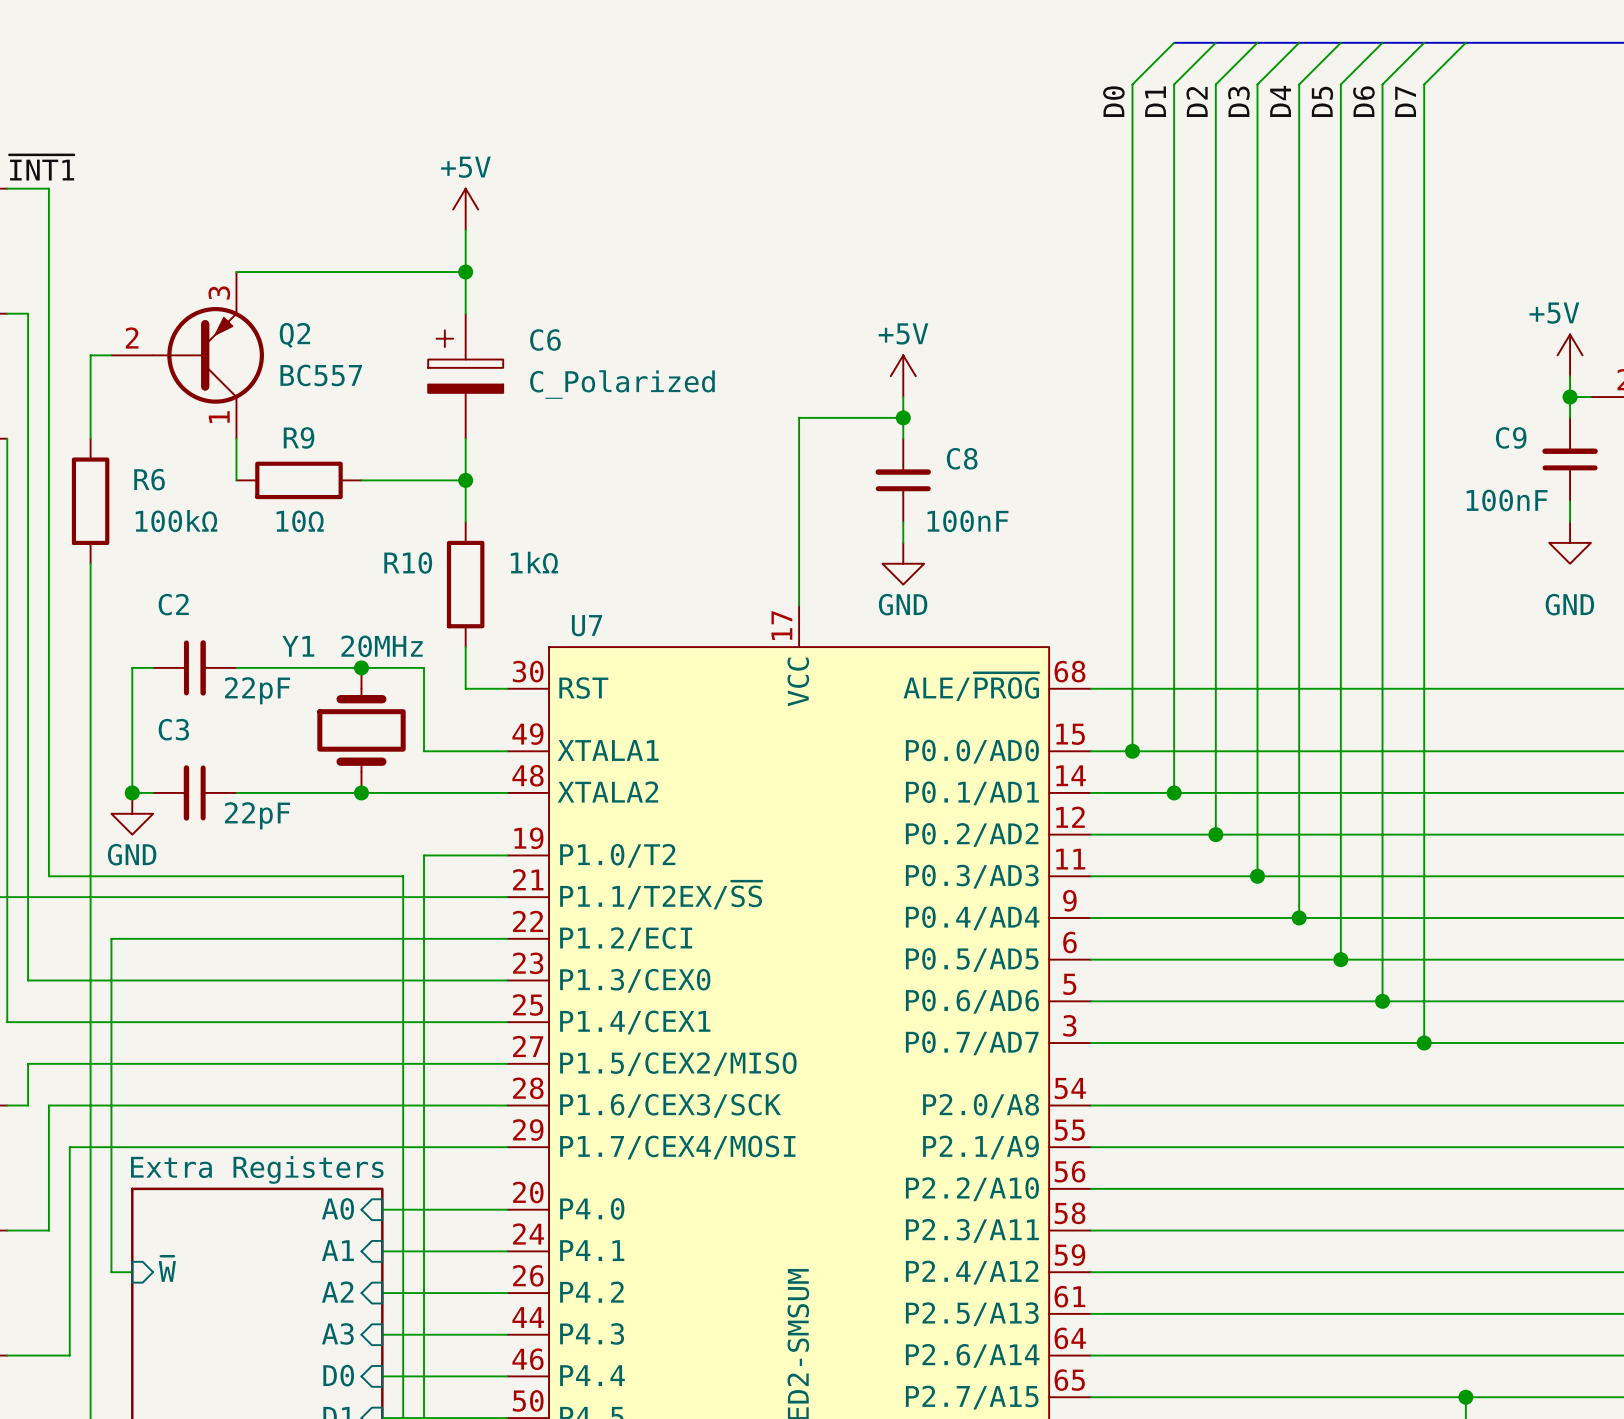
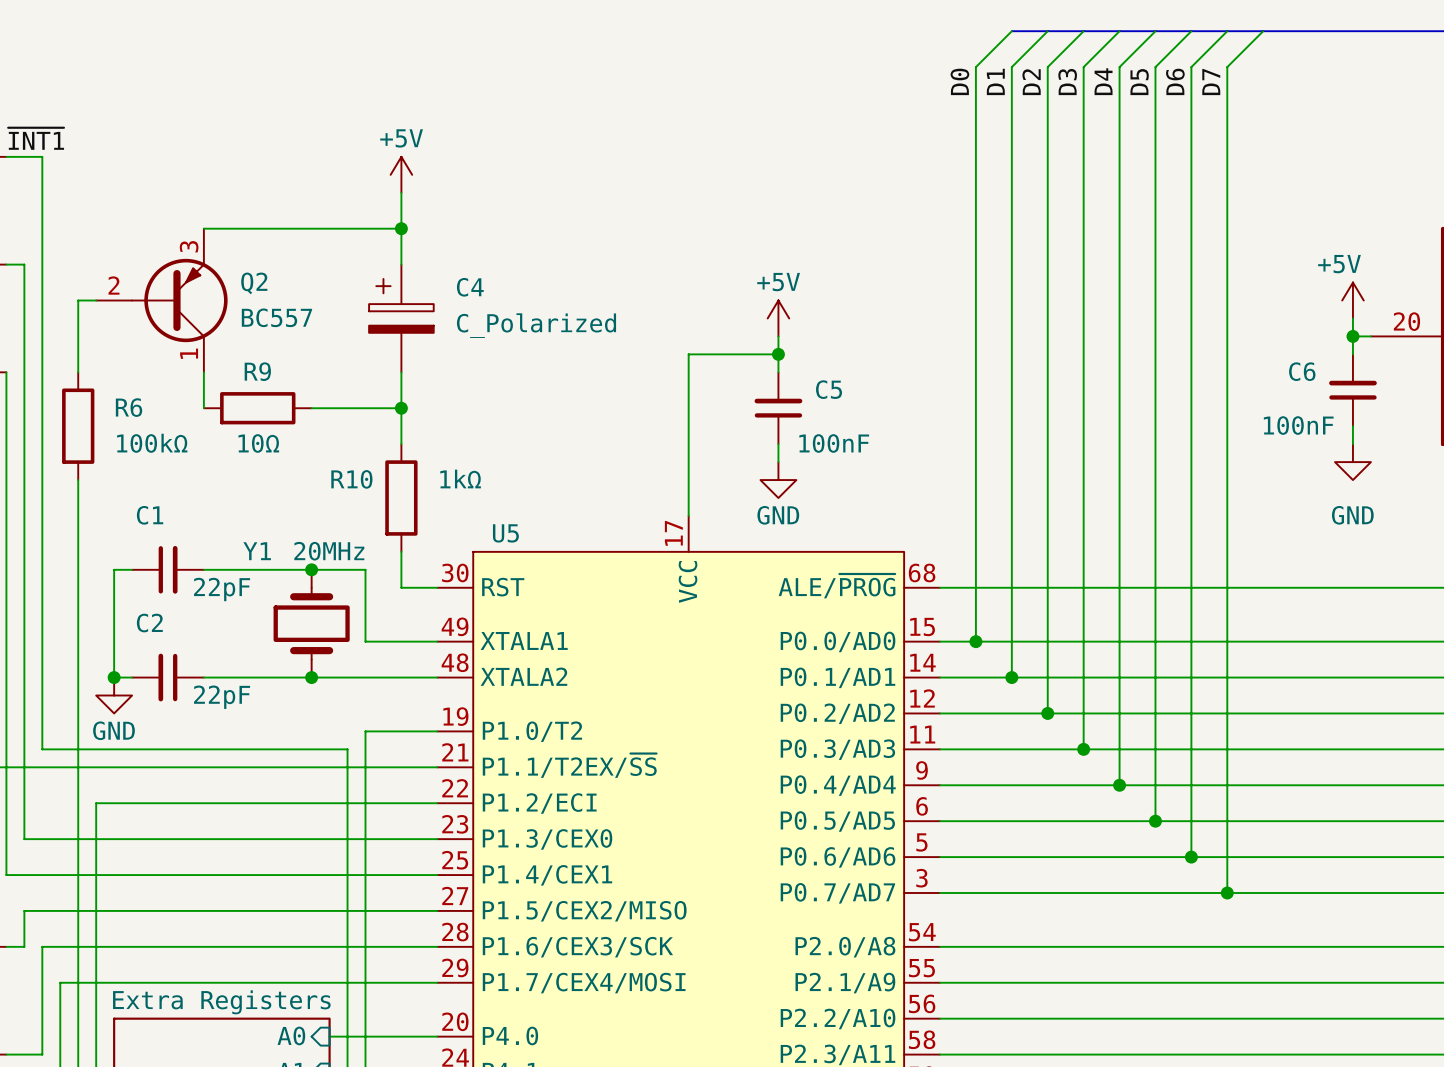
C6 name: C6 (545, 340) -> C4 (470, 287)
C9 name: C9 (1511, 437) -> C6 (1302, 371)
C8 name: C8 (962, 458) -> C5 (829, 389)
C2 name: C2 (173, 604) -> C1 (150, 515)
U7 name: U7 (587, 625) -> U5 (505, 533)
C3 name: C3 (173, 729) -> C2 (149, 623)

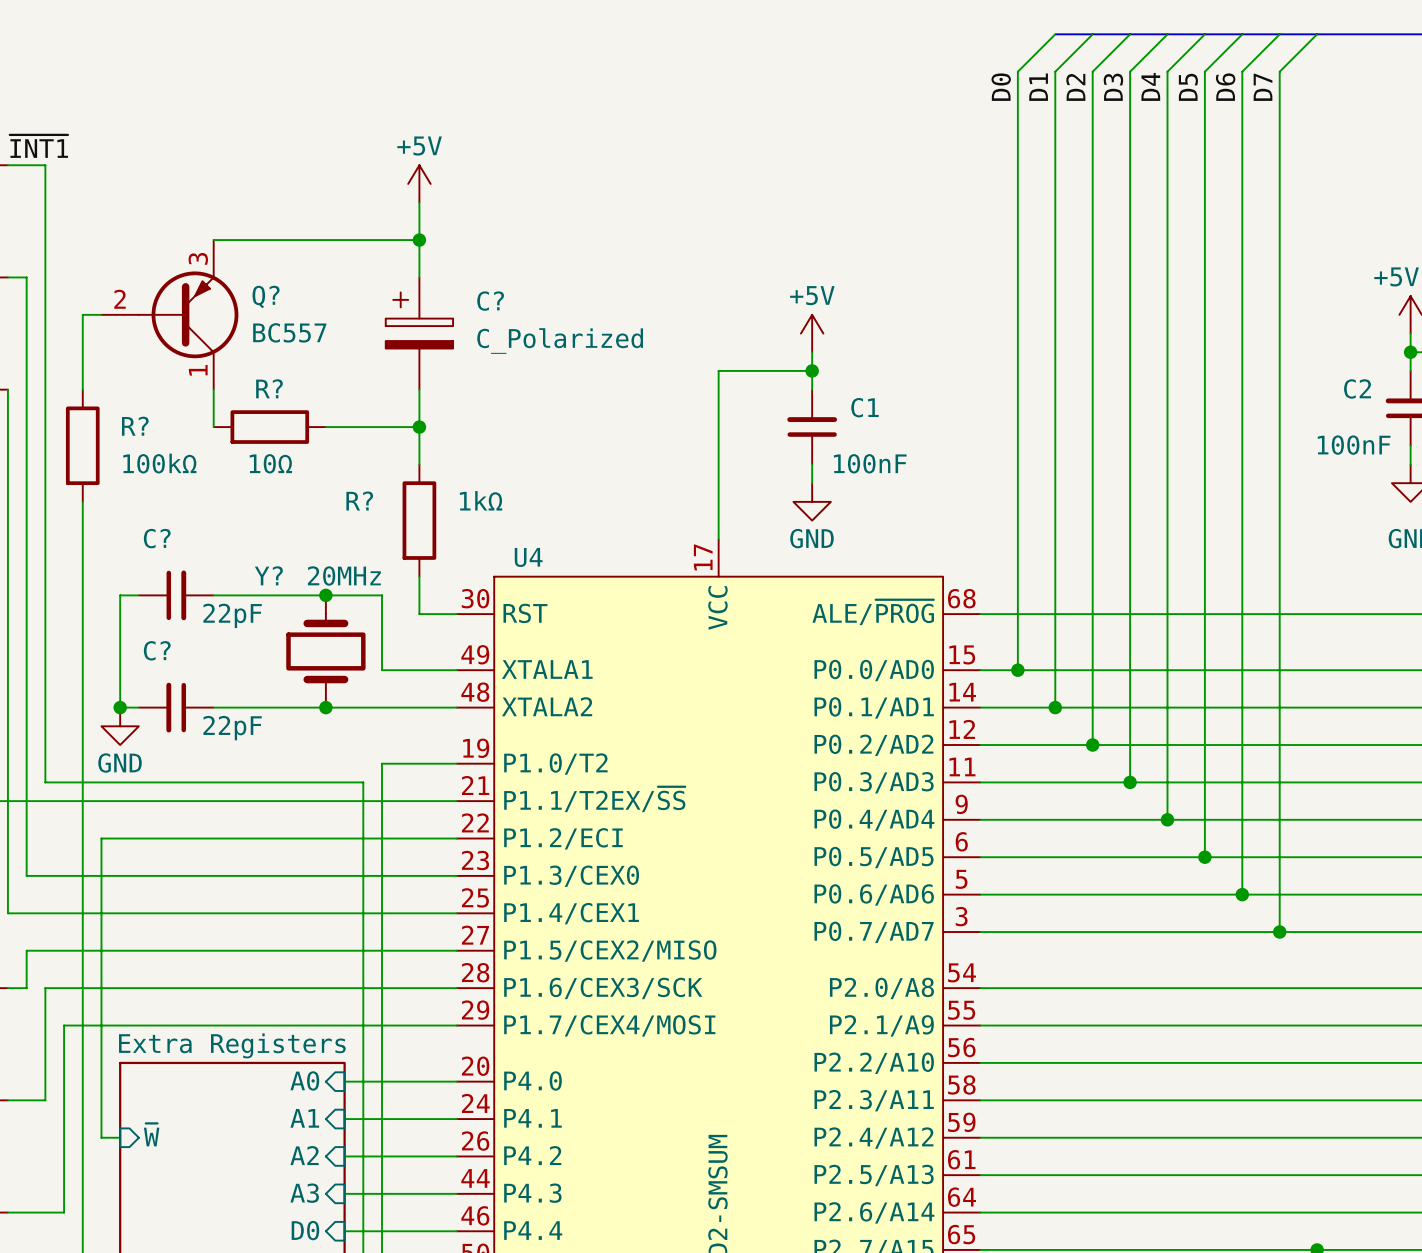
Q2 name: Q2 (254, 283) -> Q? (266, 296)
C4 name: C4 (470, 287) -> C? (490, 301)
R9 name: R9 (257, 371) -> R? (269, 388)
C6 name: C6 (1302, 371) -> C2 (1357, 388)
C5 name: C5 (829, 389) -> C1 (865, 407)
R6 name: R6 (129, 407) -> R? (135, 426)
R10 name: R10 (351, 479) -> R? (359, 501)
C1 name: C1 (150, 515) -> C? (157, 538)
U5 name: U5 (505, 533) -> U4 (528, 557)
Y1 name: Y1 (257, 551) -> Y? (268, 575)
C2 name: C2 (149, 623) -> C? (157, 650)

